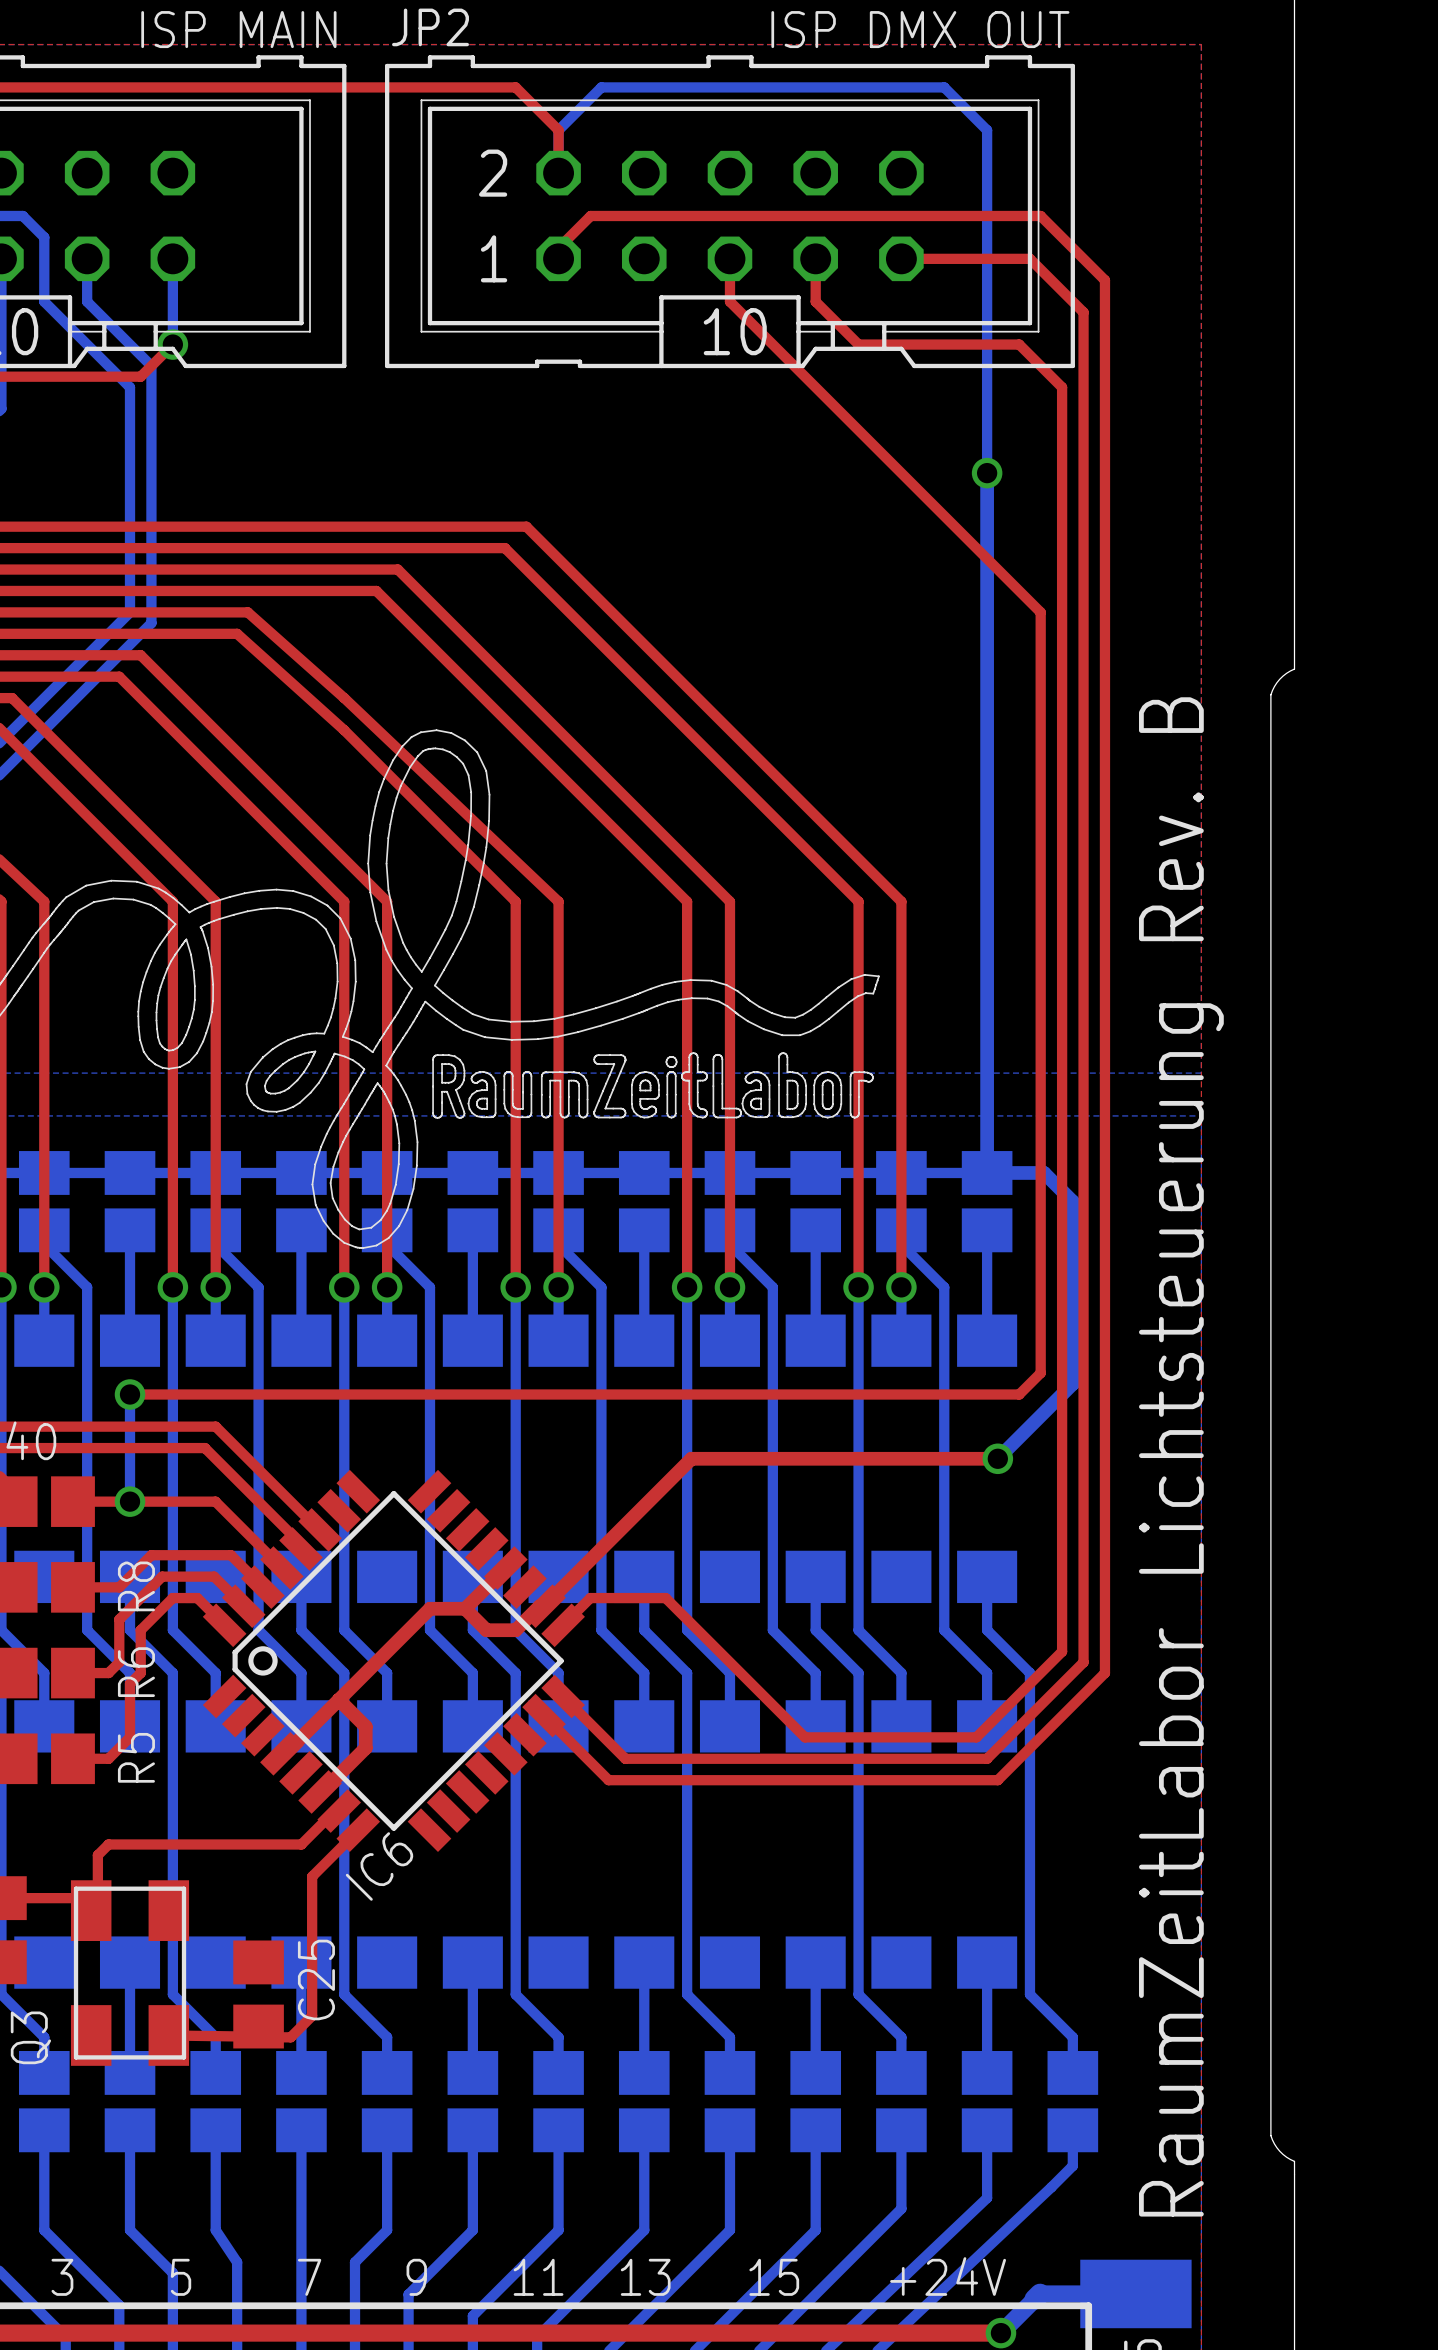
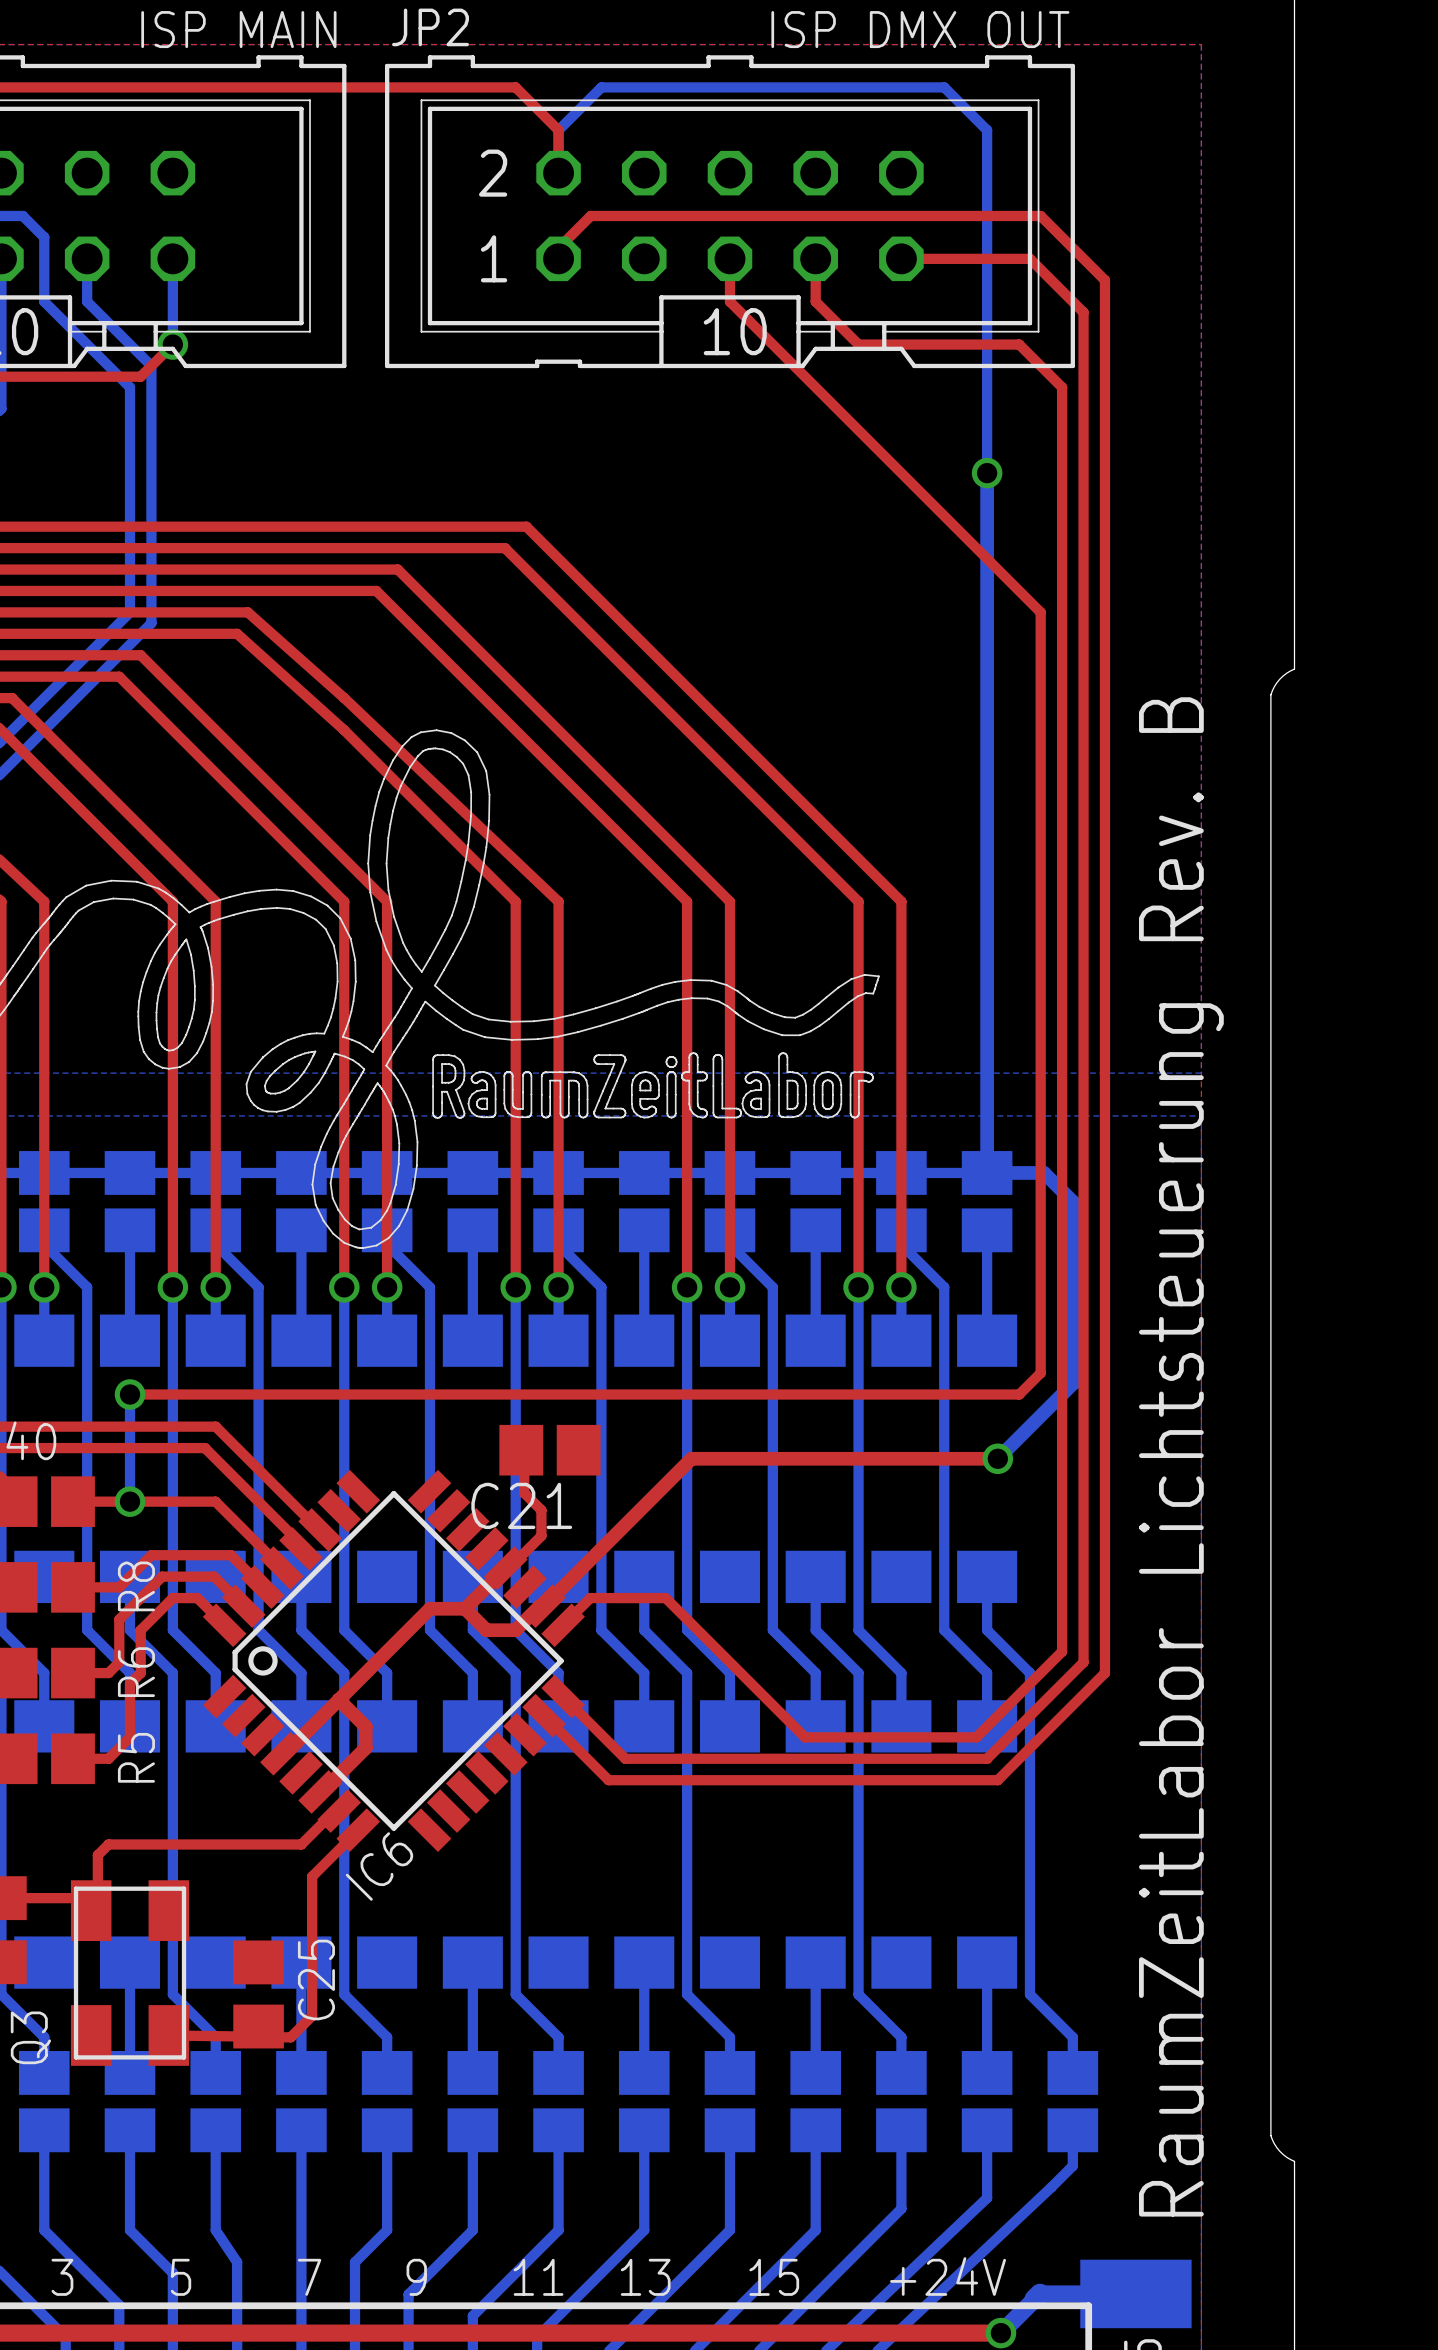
top track: none -> (521, 1450) (524, 1453) (524, 1493) (541, 1510) (541, 1535) (509, 1568) (505, 1568)
C21: none -> (549, 1450)

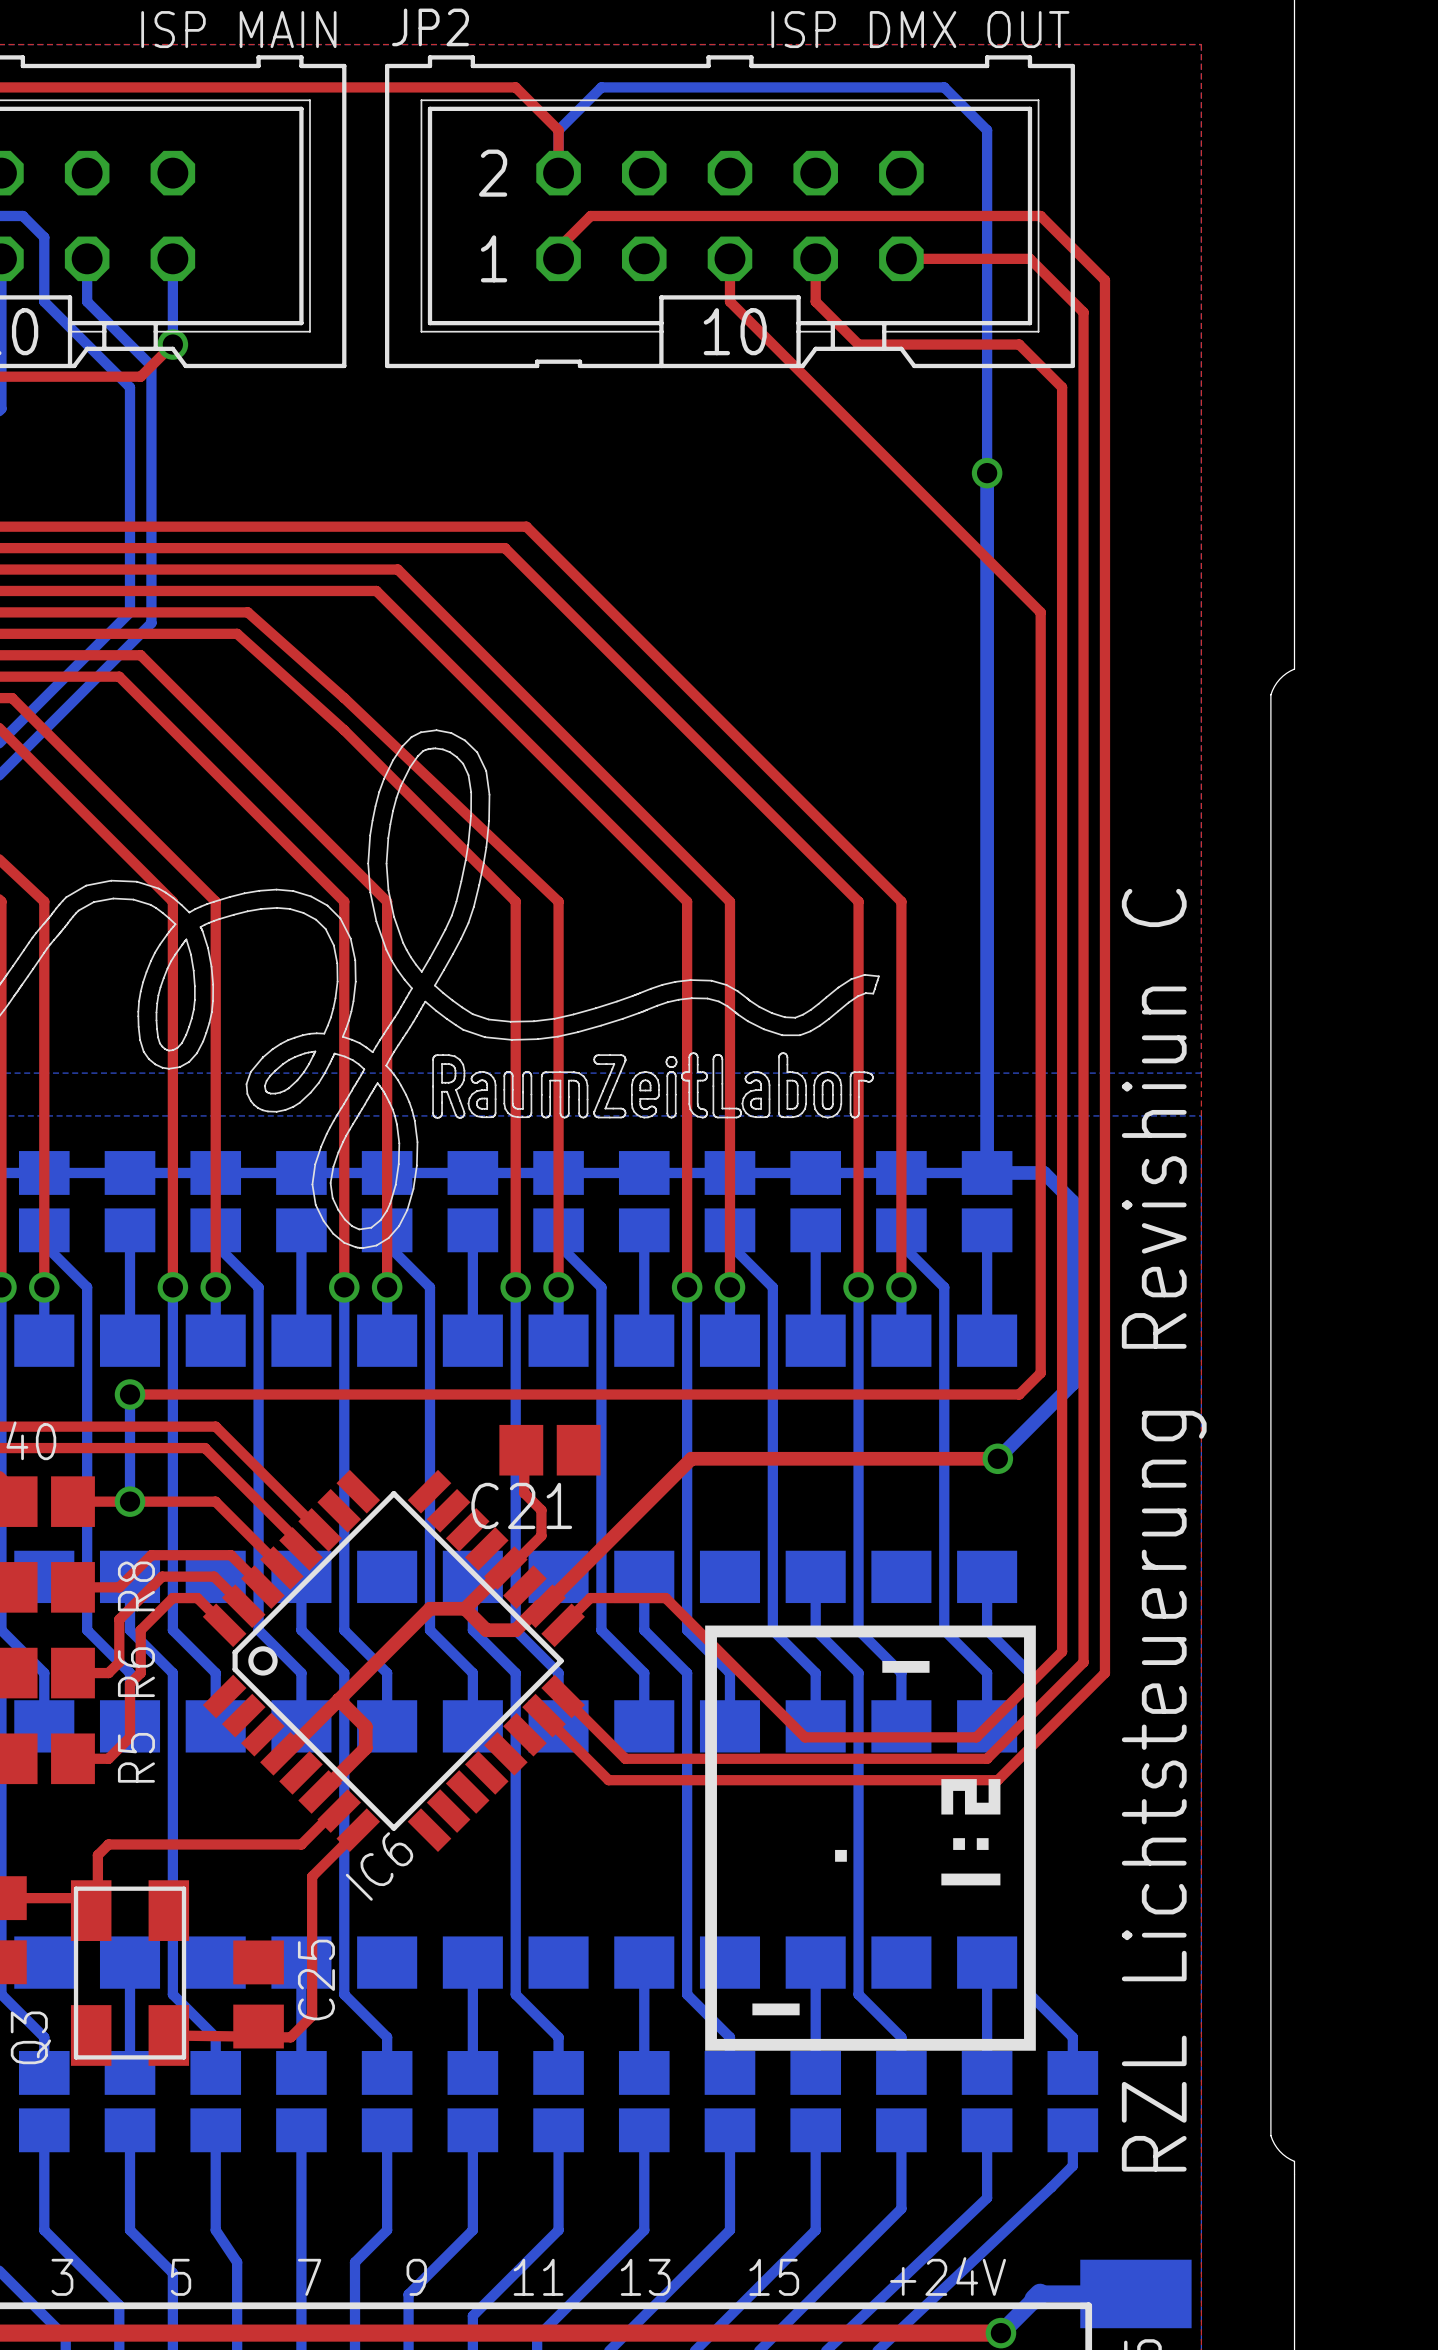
text: RaumZeitLabor Lichtsteuerung Rev. B (1181, 1456) -> RZL Lichtsteuerung Revishiun C (1164, 1530)
drawing: none -> [705, 1625, 1036, 2051]
drawing: none -> [835, 1849, 847, 1862]

